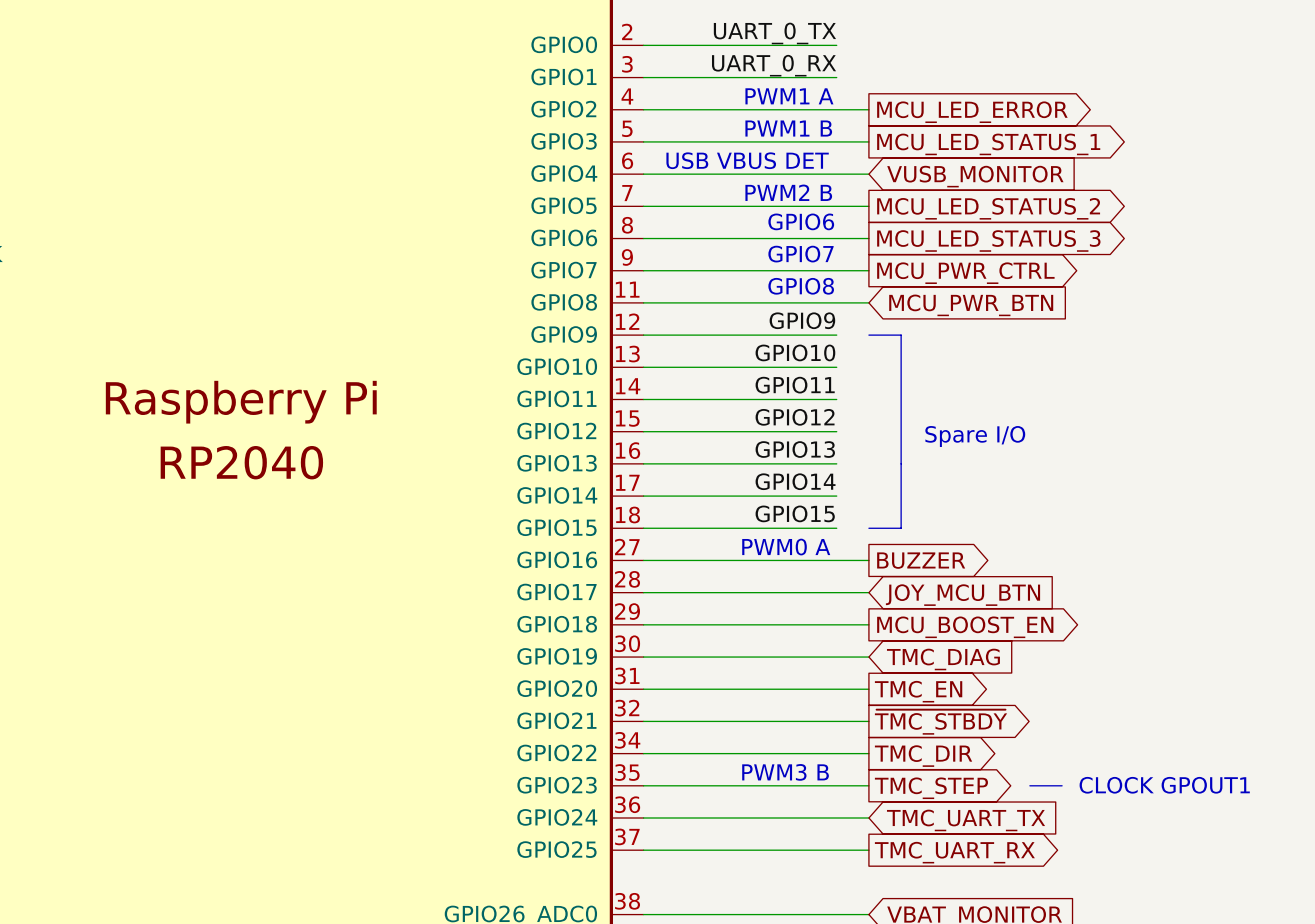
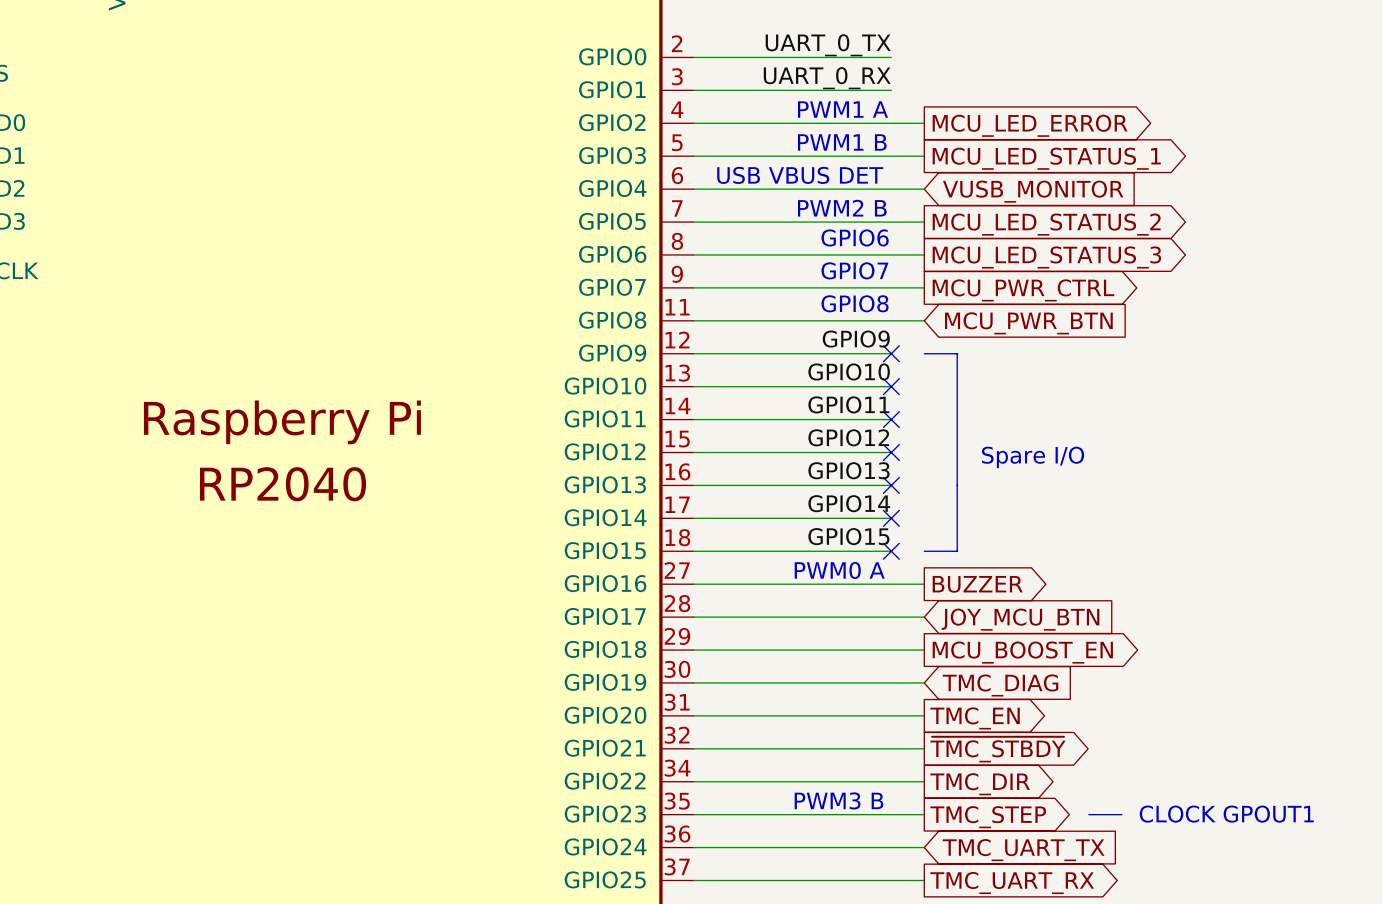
no-connect mark: none -> (891, 353)
no-connect mark: none -> (891, 386)
no-connect mark: none -> (891, 419)
no-connect mark: none -> (891, 452)
no-connect mark: none -> (891, 485)
no-connect mark: none -> (891, 518)
no-connect mark: none -> (891, 551)

